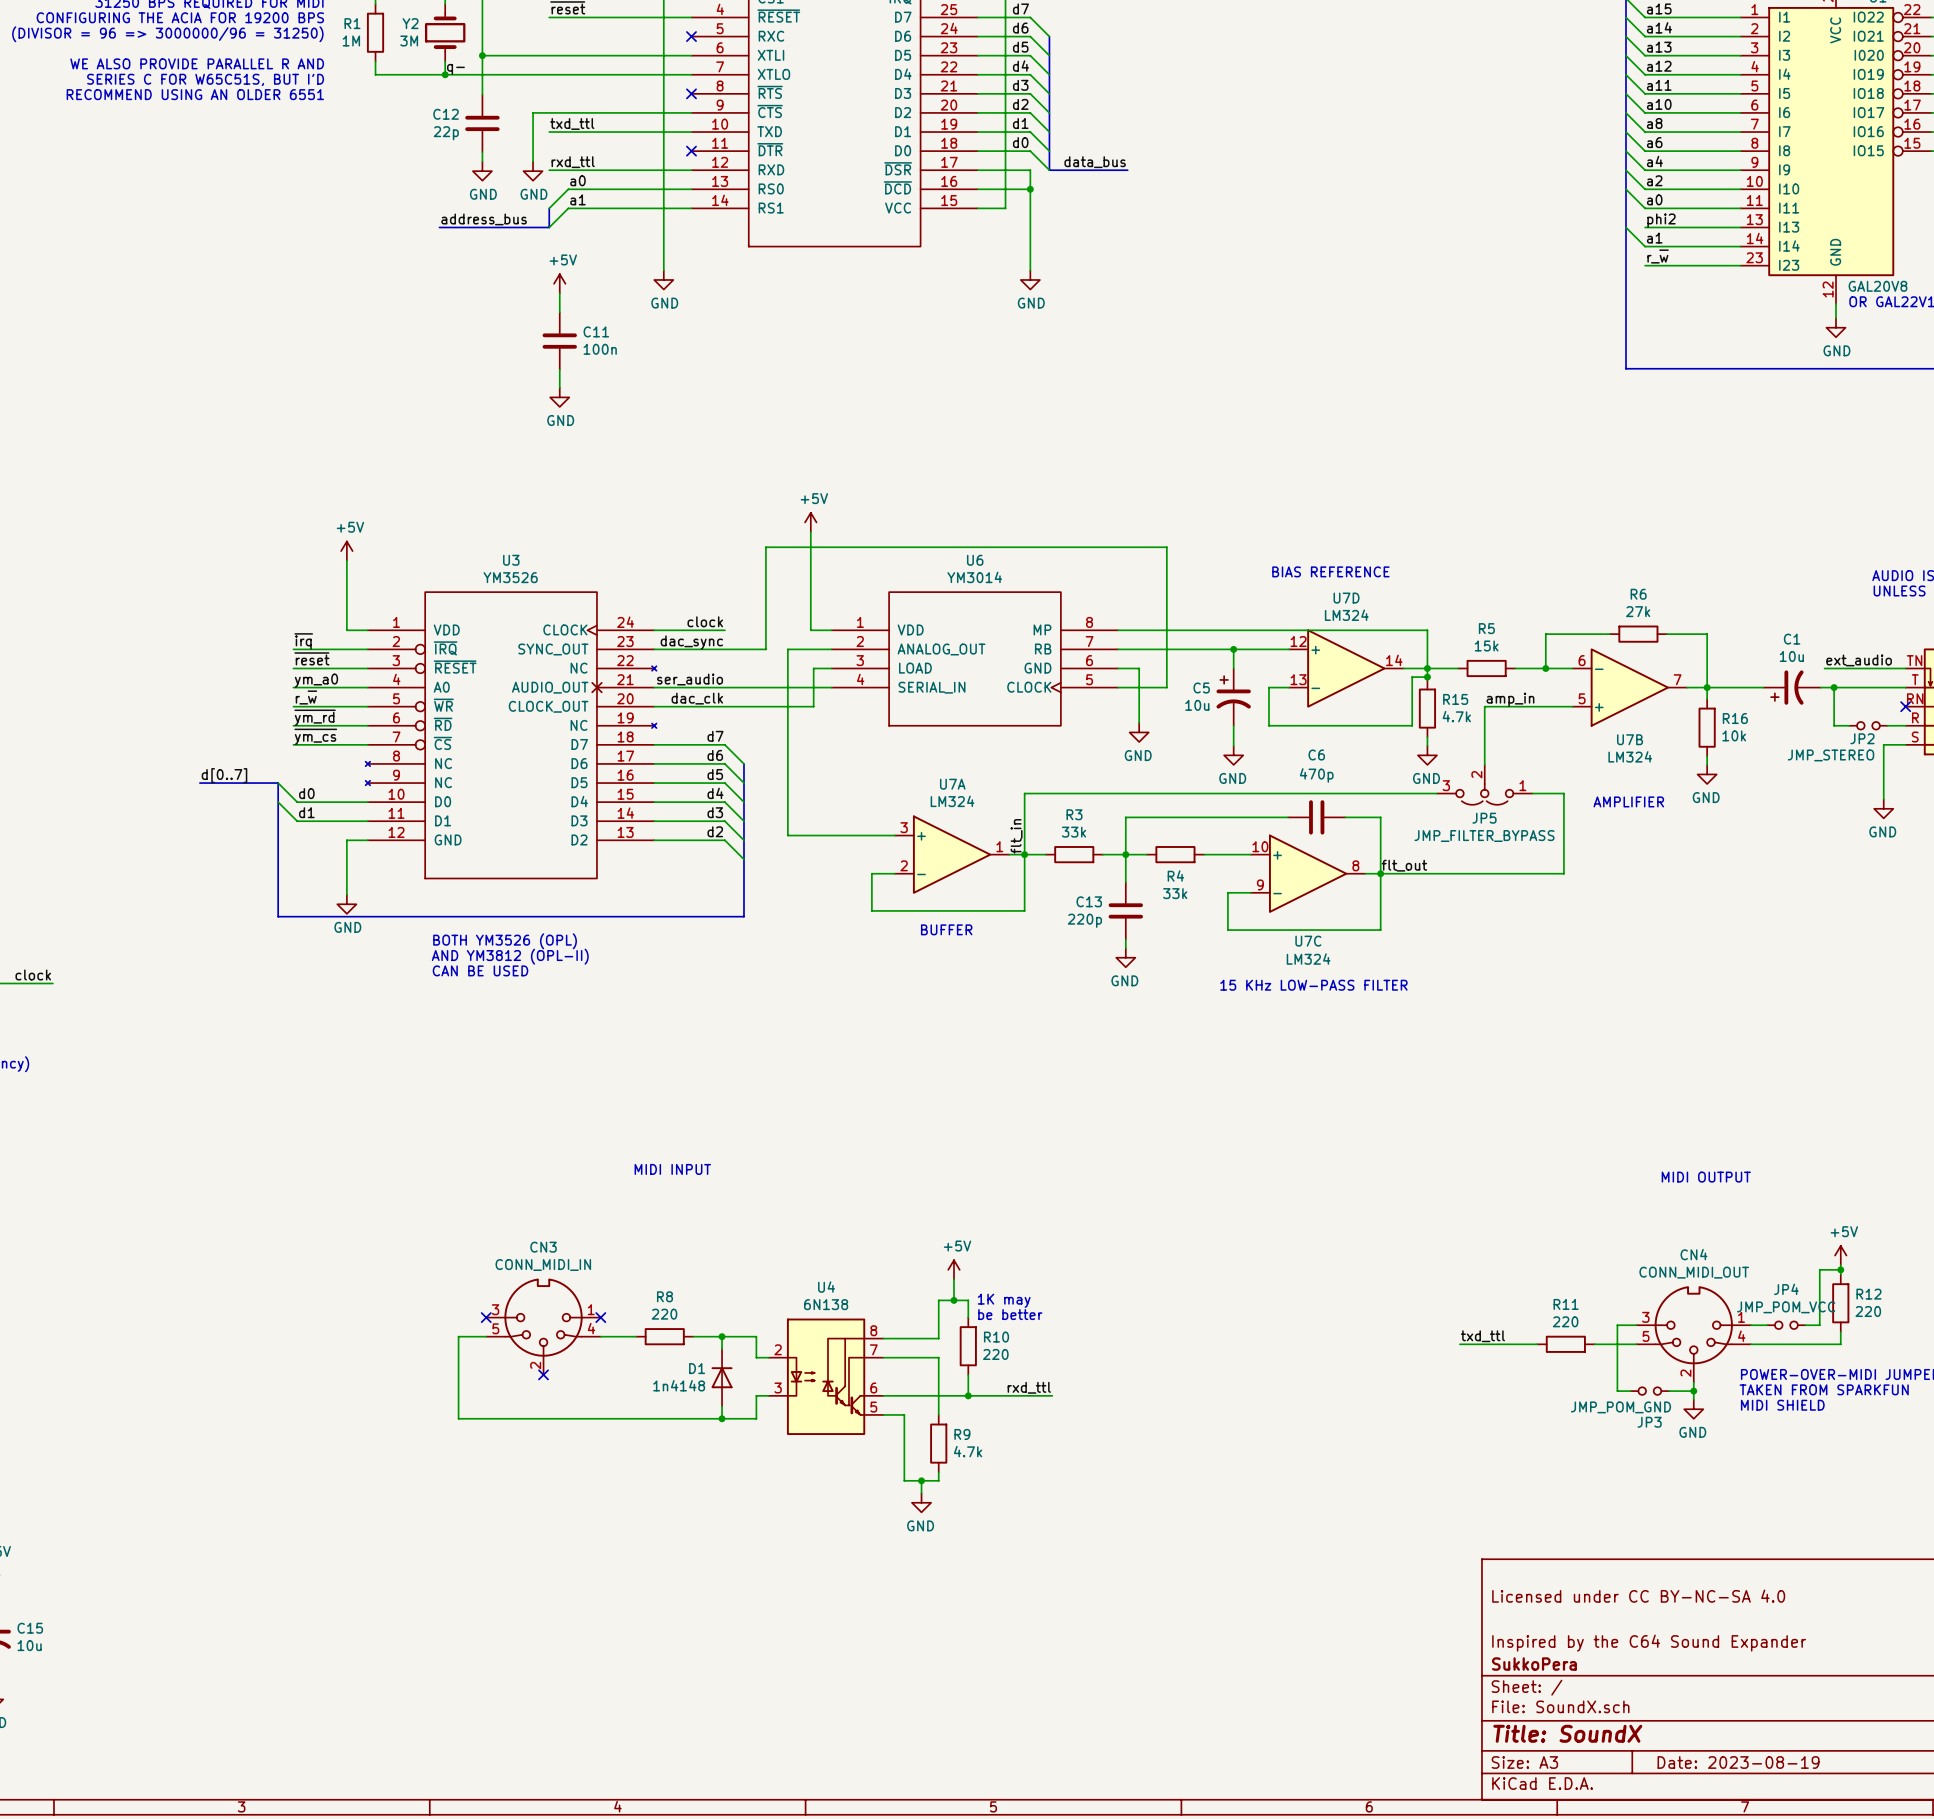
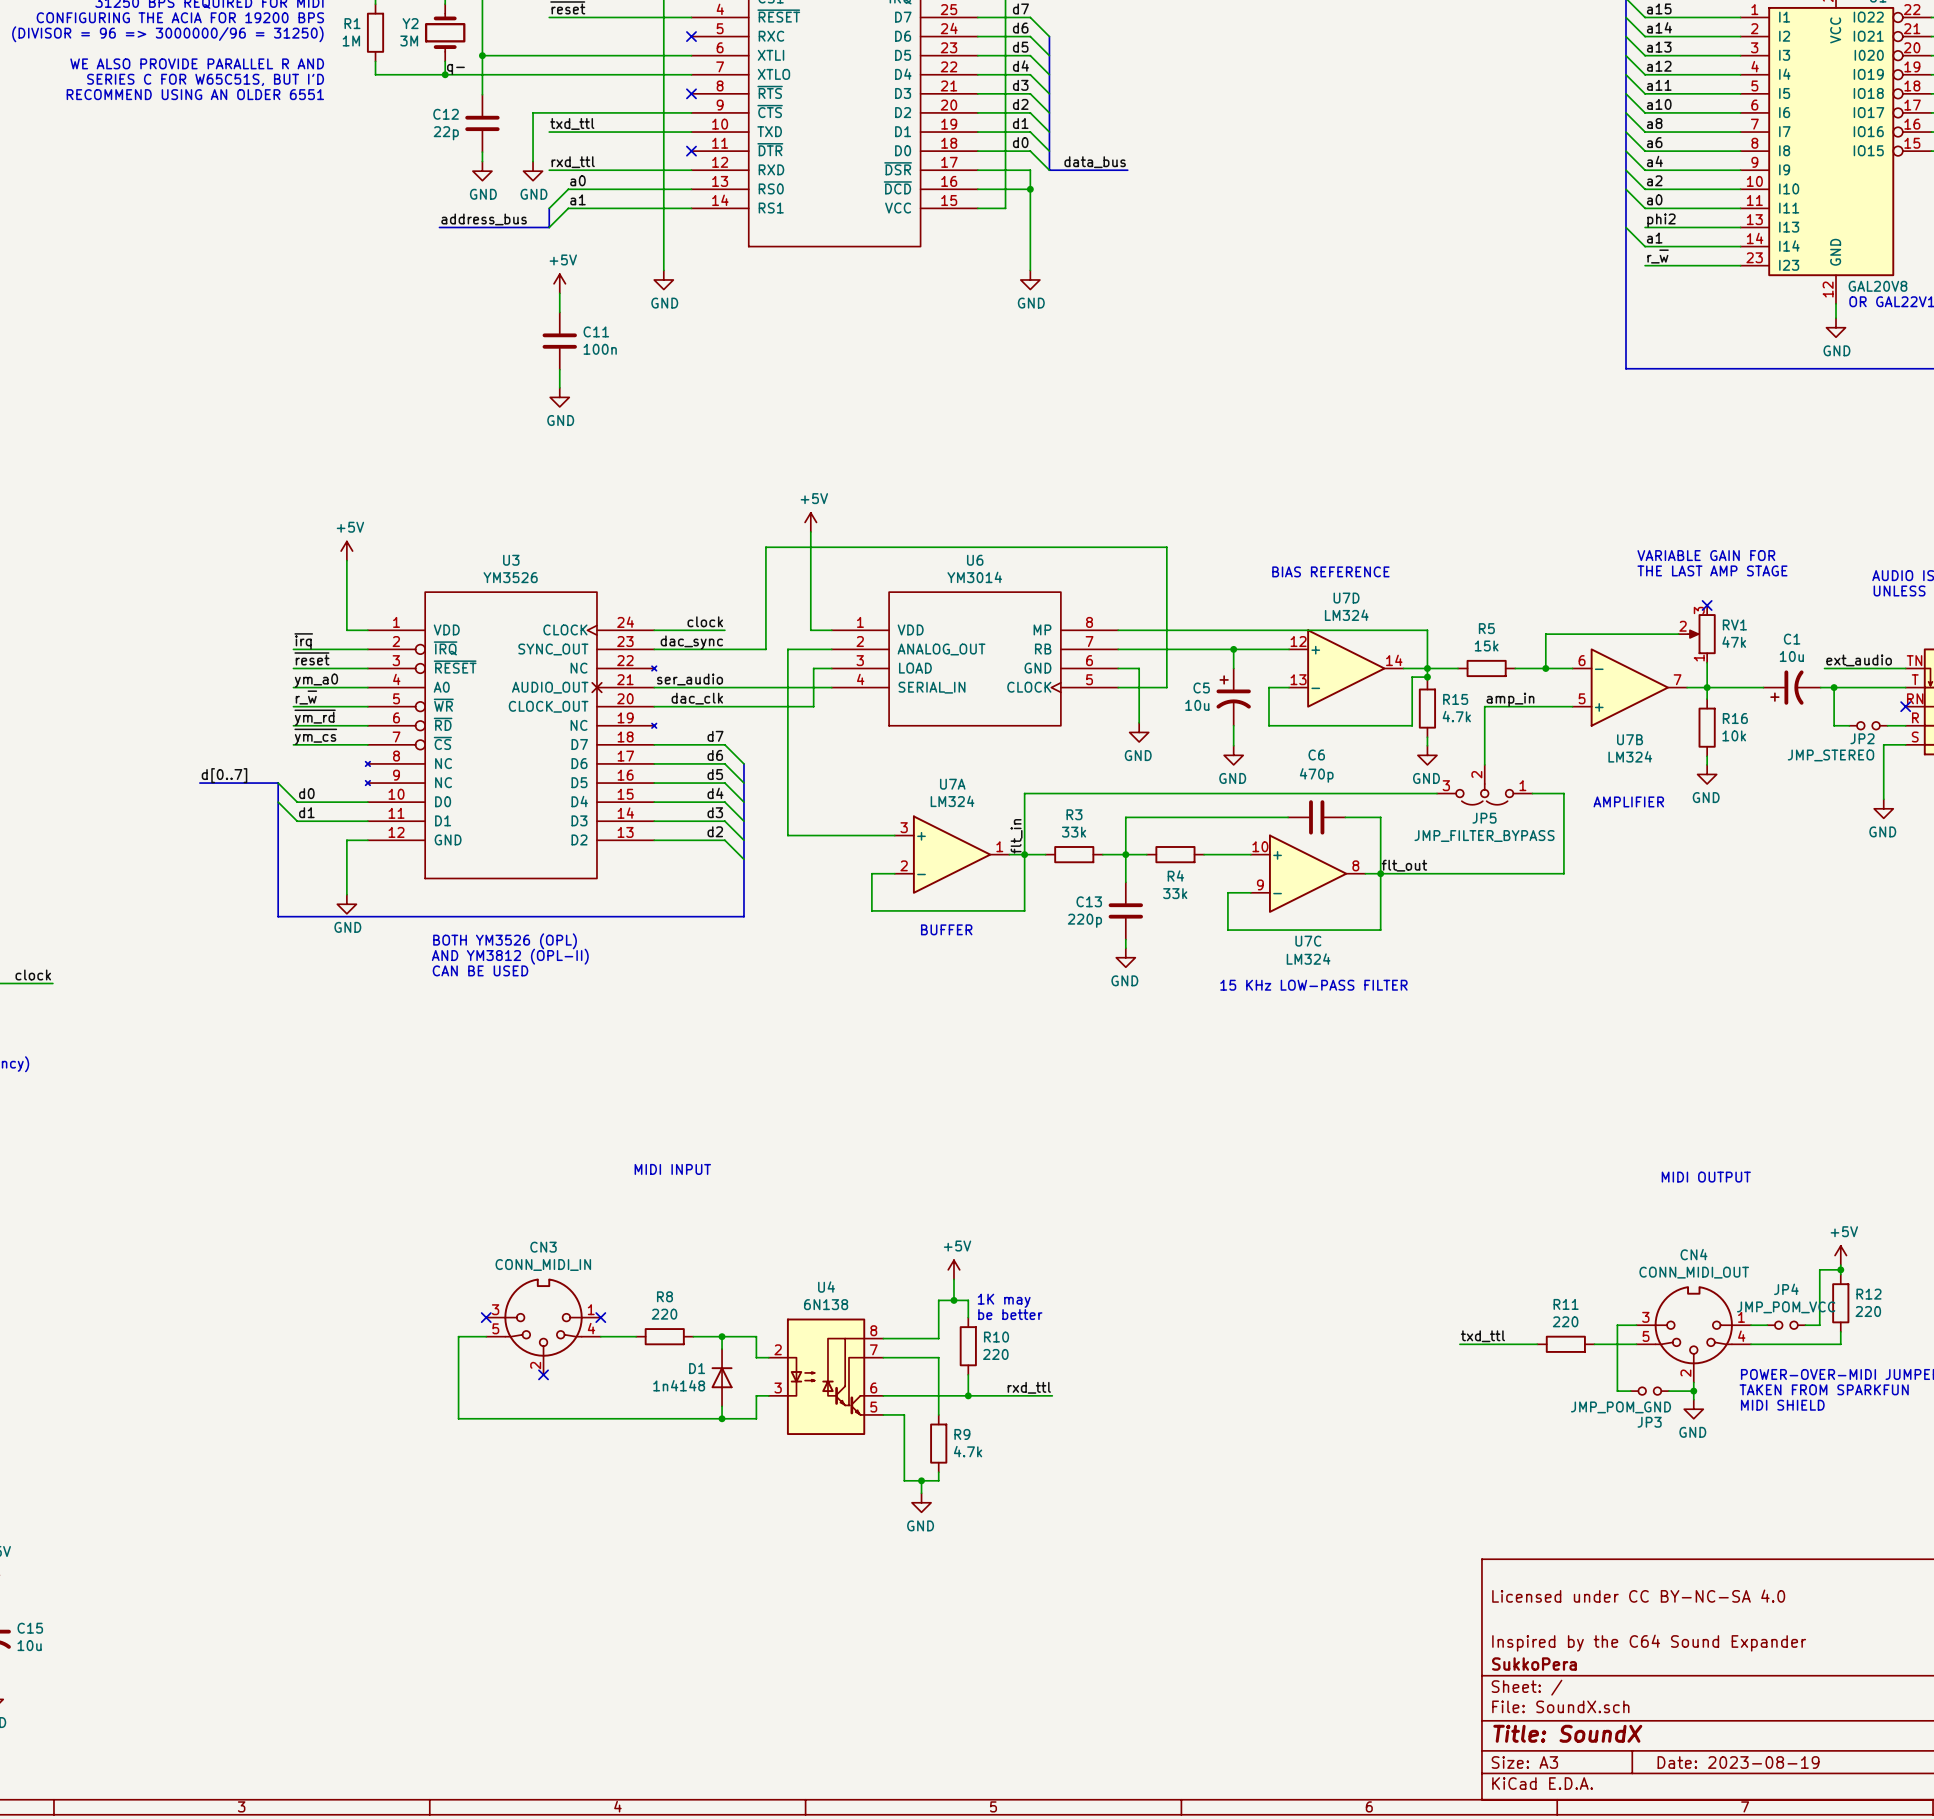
text: none -> VARIABLE GAIN FOR (1706, 555)
text: none -> THE LAST AMP STAGE (1712, 570)
no-connect mark: none -> (1707, 605)
wire: none -> (1609, 634) (1667, 634)
R6: 27k (1638, 634) -> none
wire: (1678, 634) (1707, 634) (1707, 662) -> none
RV1: none -> 47k (1697, 634)

